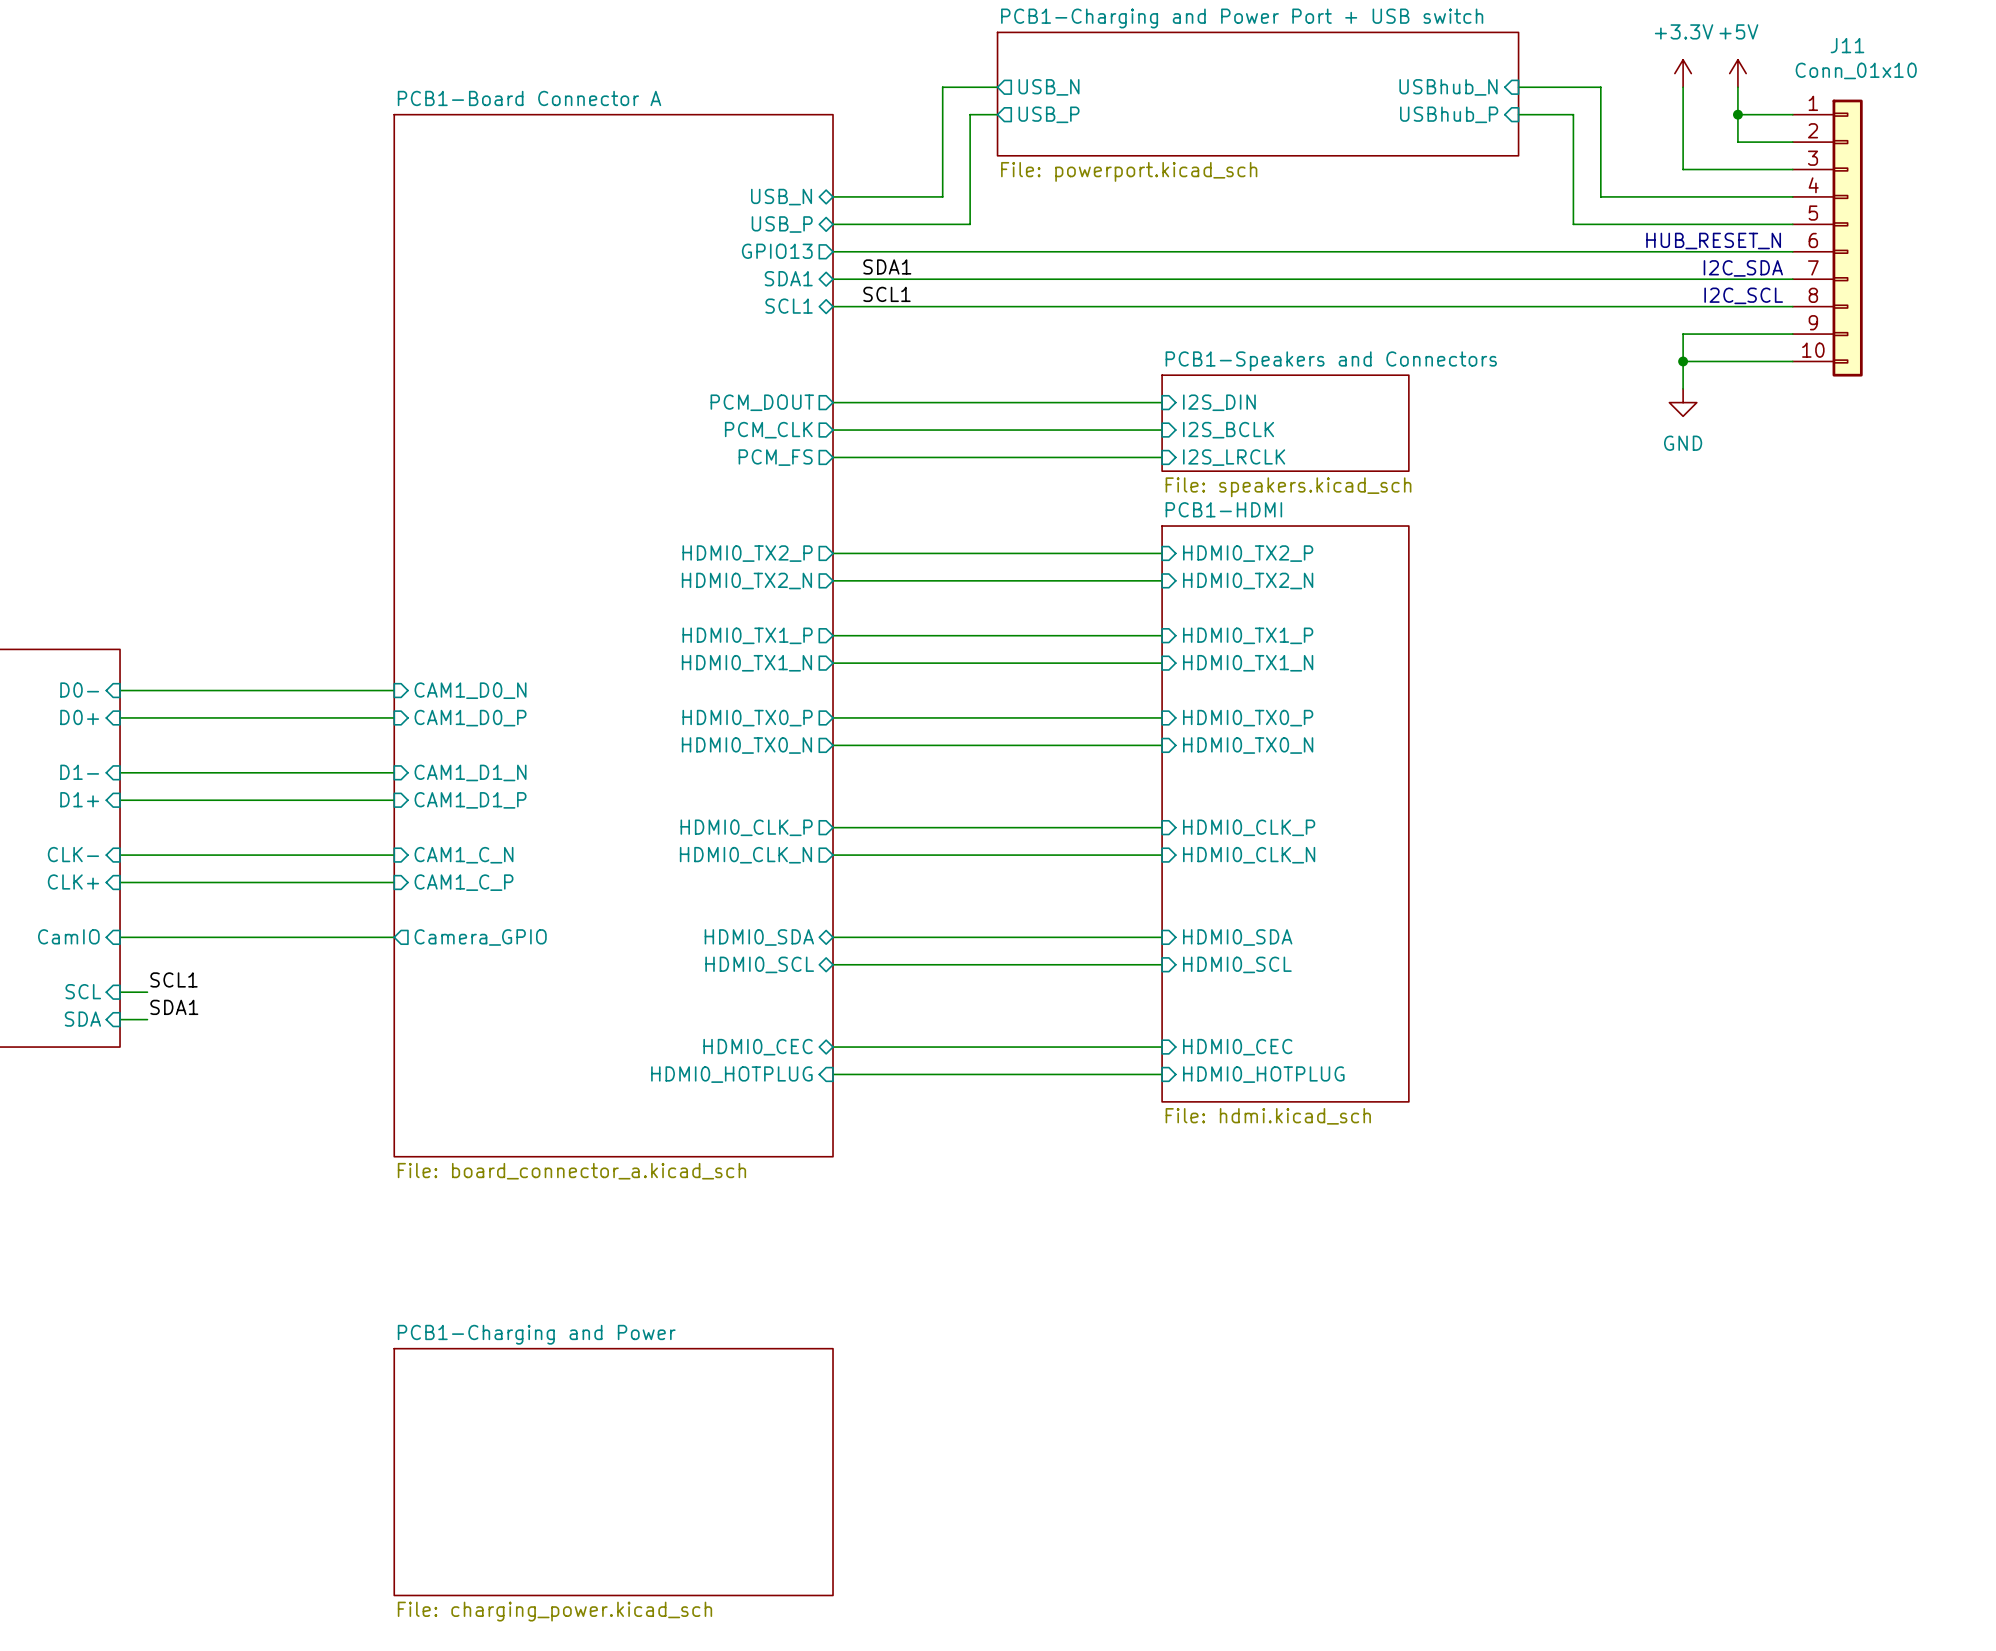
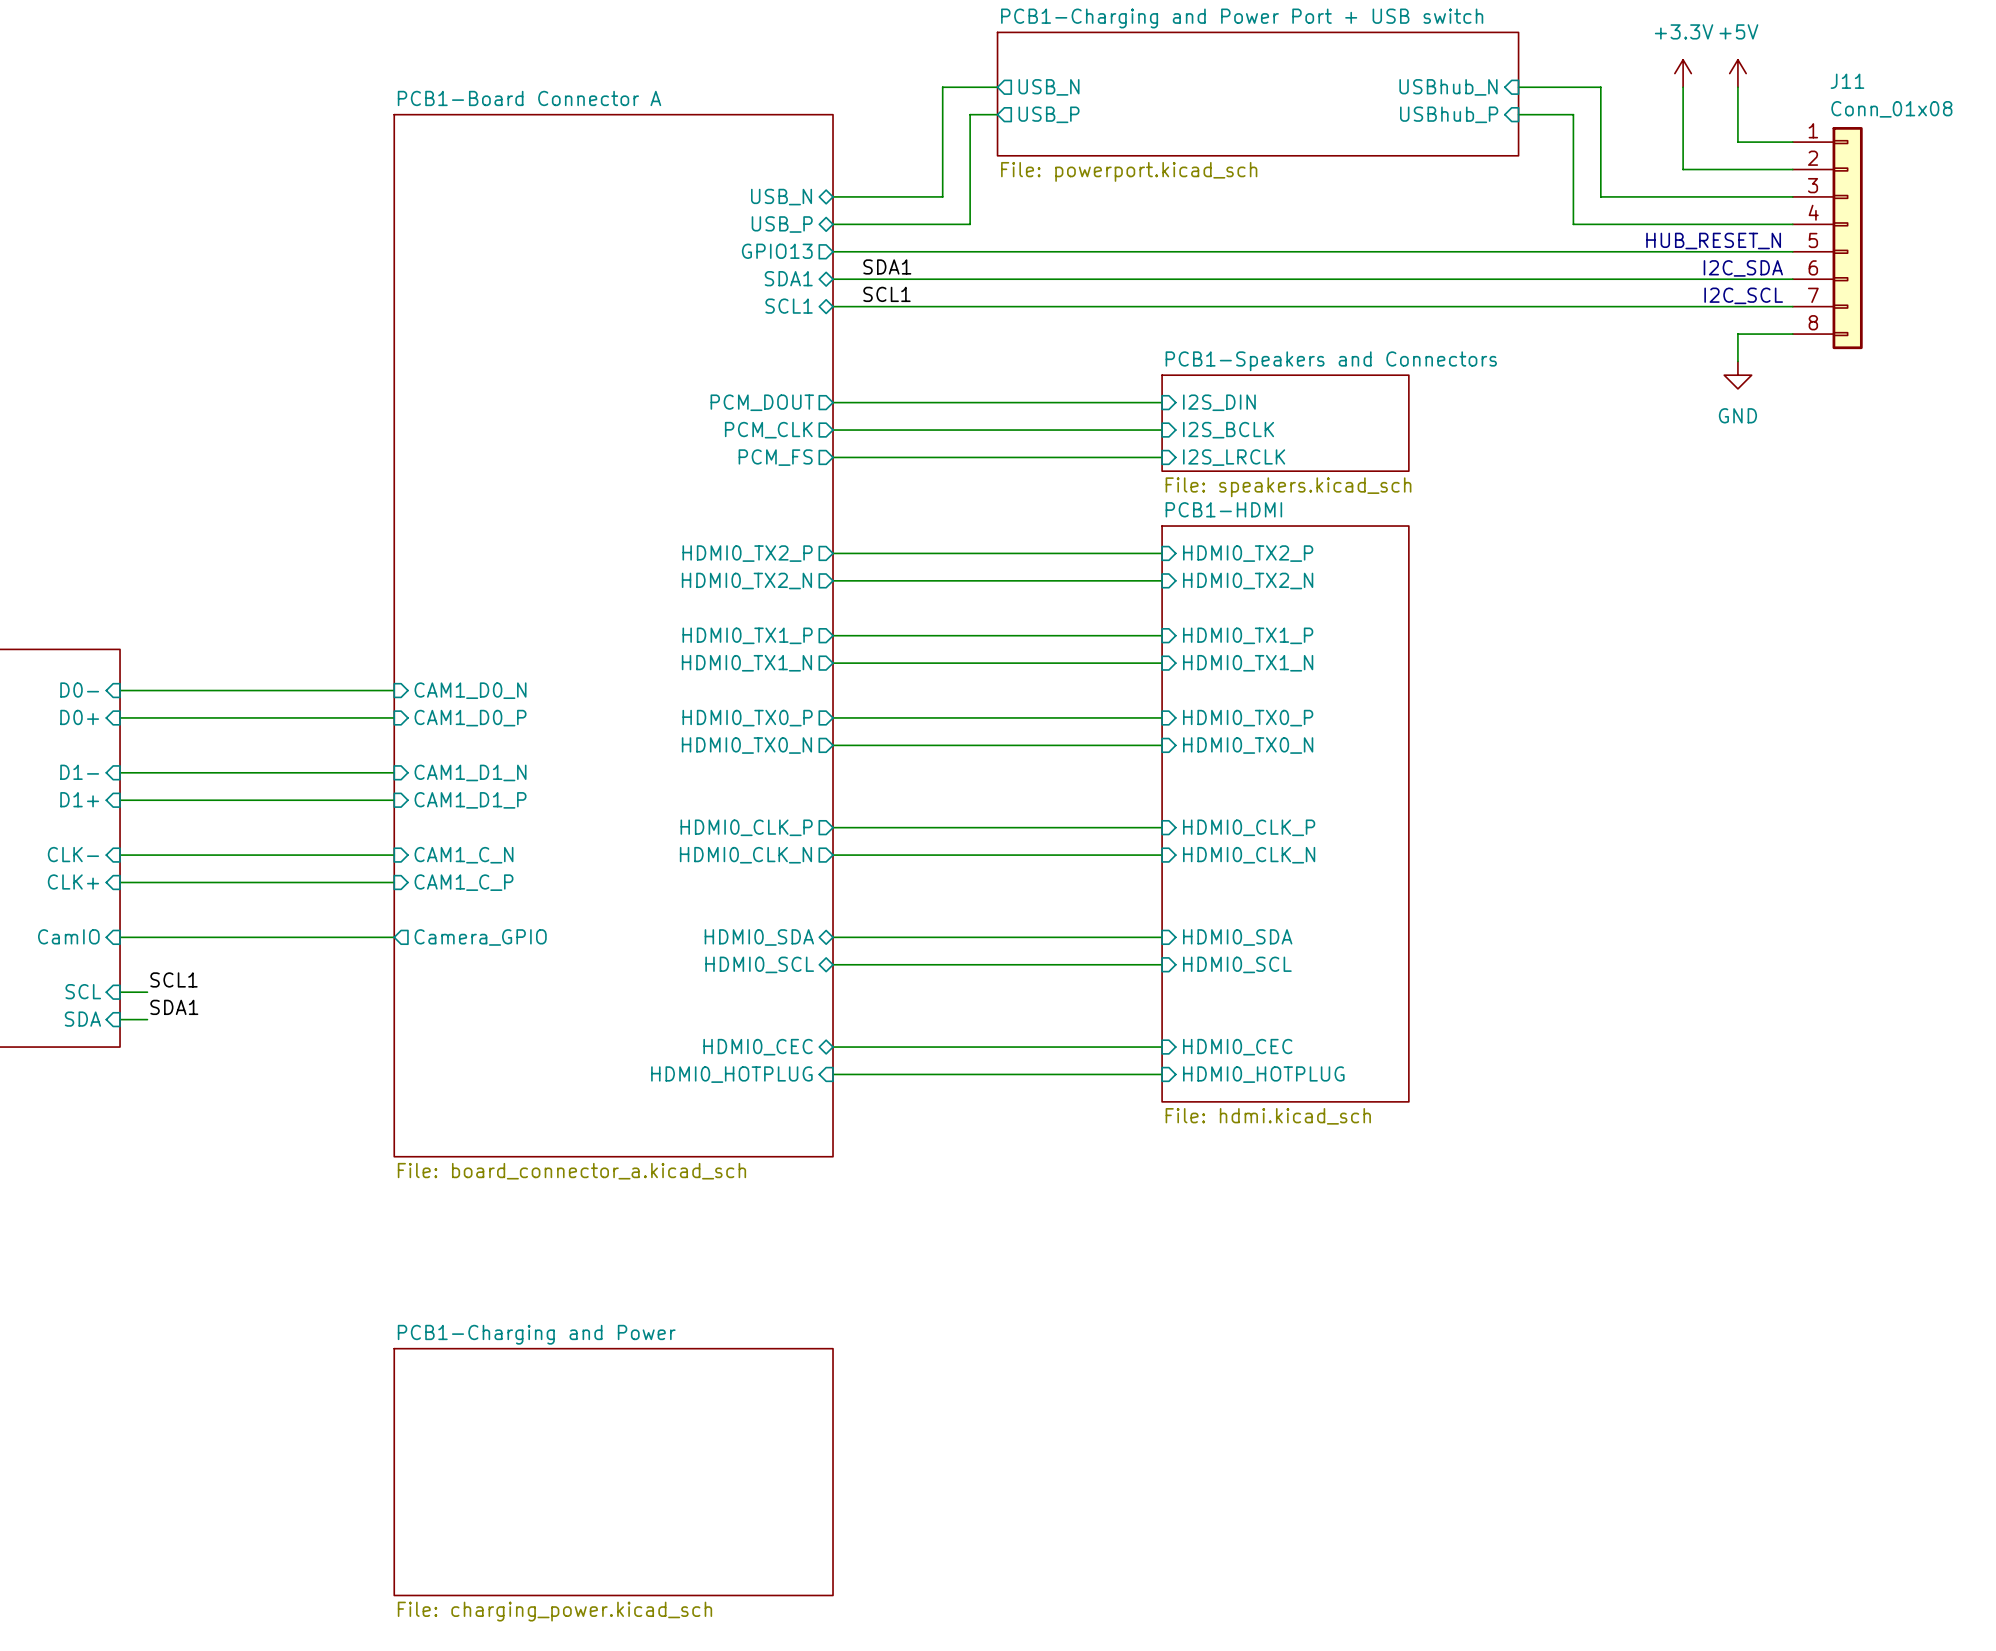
J11 name position: J11 (1847, 45) -> J11 (1847, 81)
J11 value: Conn_01x10 (1856, 70) -> Conn_01x08 (1891, 109)
J11 symbol: [1792, 99, 1863, 377] -> [1792, 127, 1863, 350]
wire: (1737, 114) (1792, 114) -> none
junction: (1737, 114) -> none
wire: (1737, 334) (1683, 334) (1683, 388) -> (1737, 334) (1737, 361)
wire: (1683, 361) (1792, 361) -> none
junction: (1683, 361) -> none
power symbol position: GND (1683, 402) -> GND (1737, 375)

